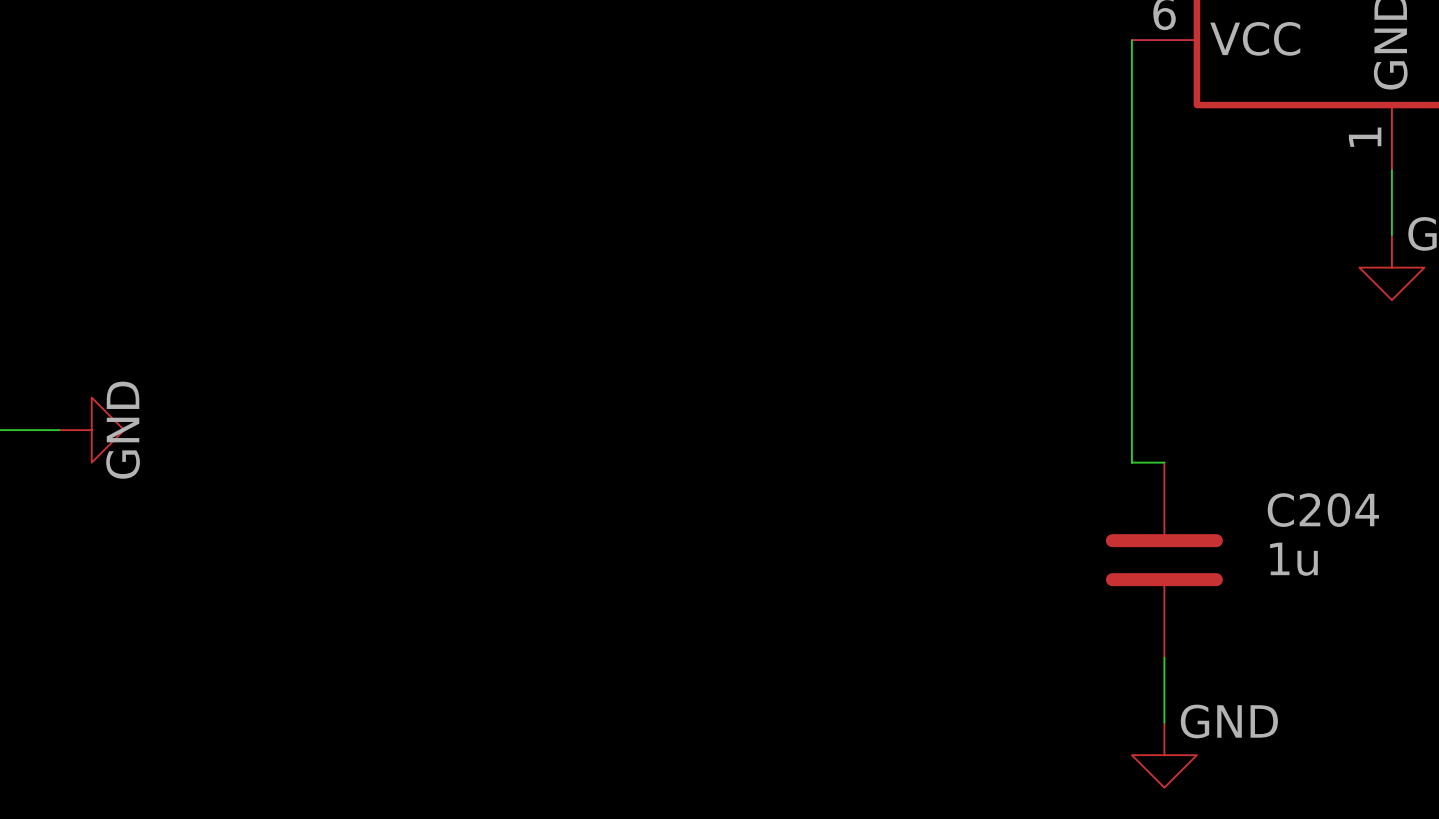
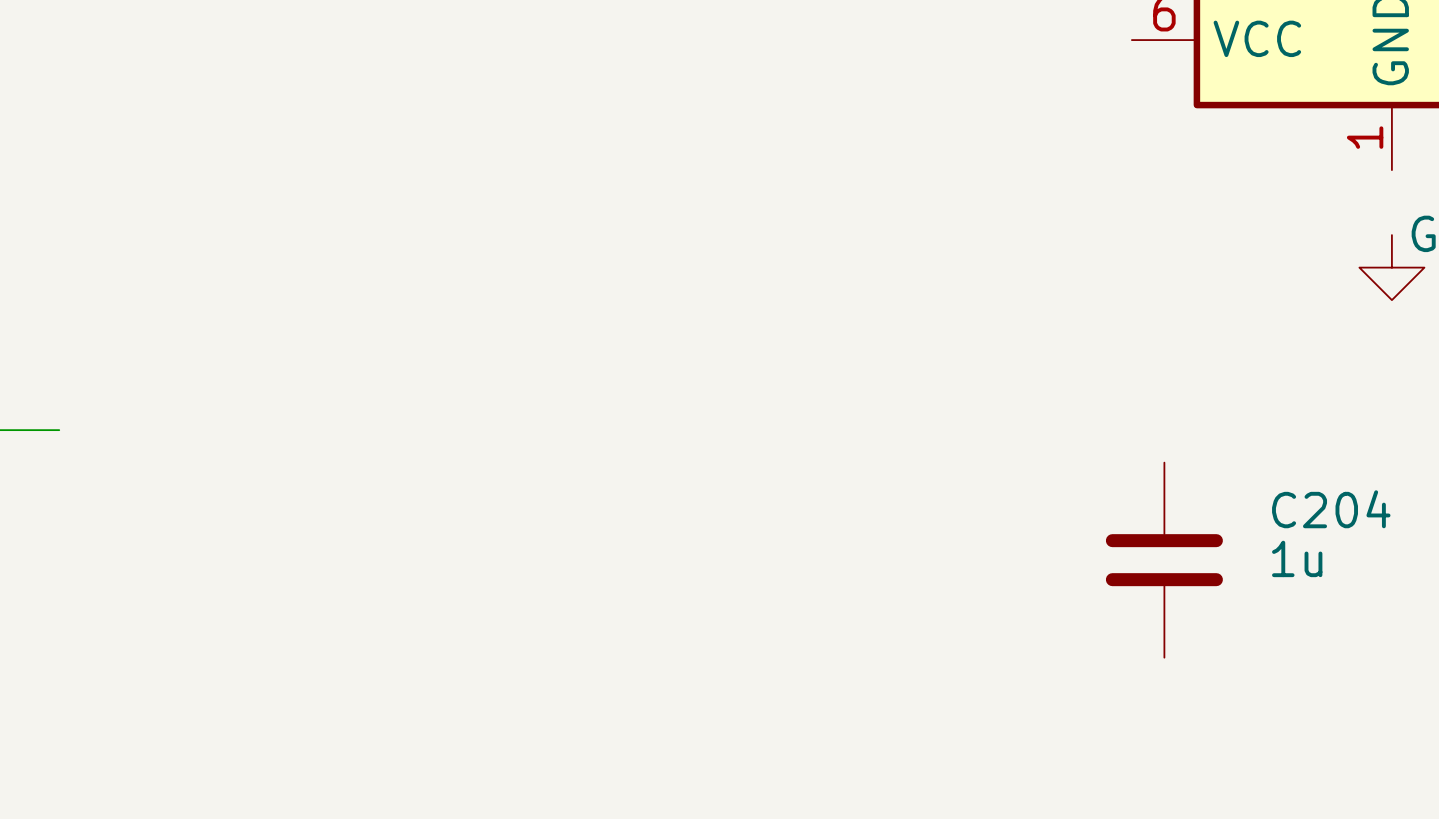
wire: (1131, 40) (1131, 462) (1164, 462) -> none
wire: (1391, 170) (1391, 235) -> none
power symbol: GND (91, 430) -> none
wire: (1164, 657) (1164, 722) -> none
power symbol: GND (1164, 755) -> none

